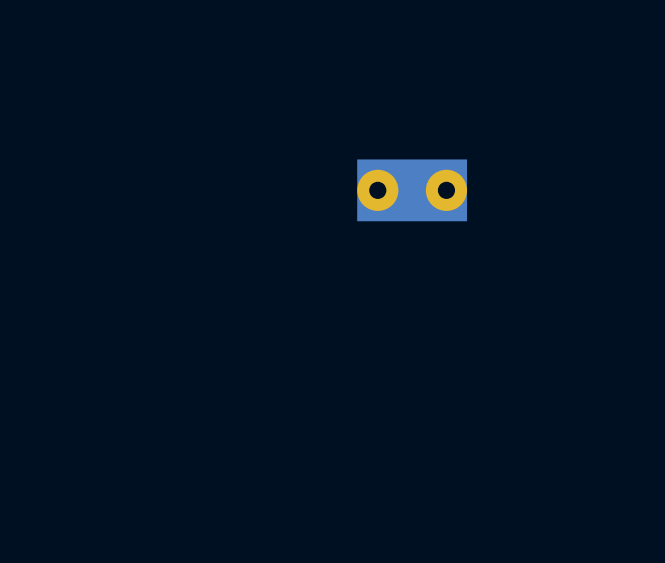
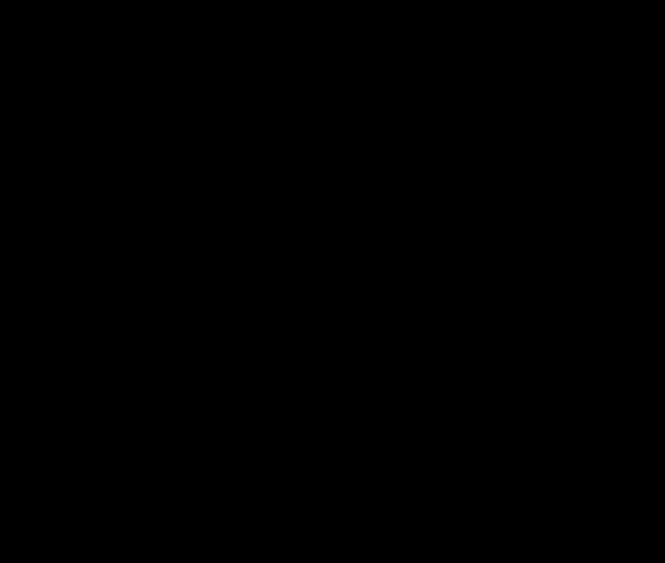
part: (412, 190) -> none

